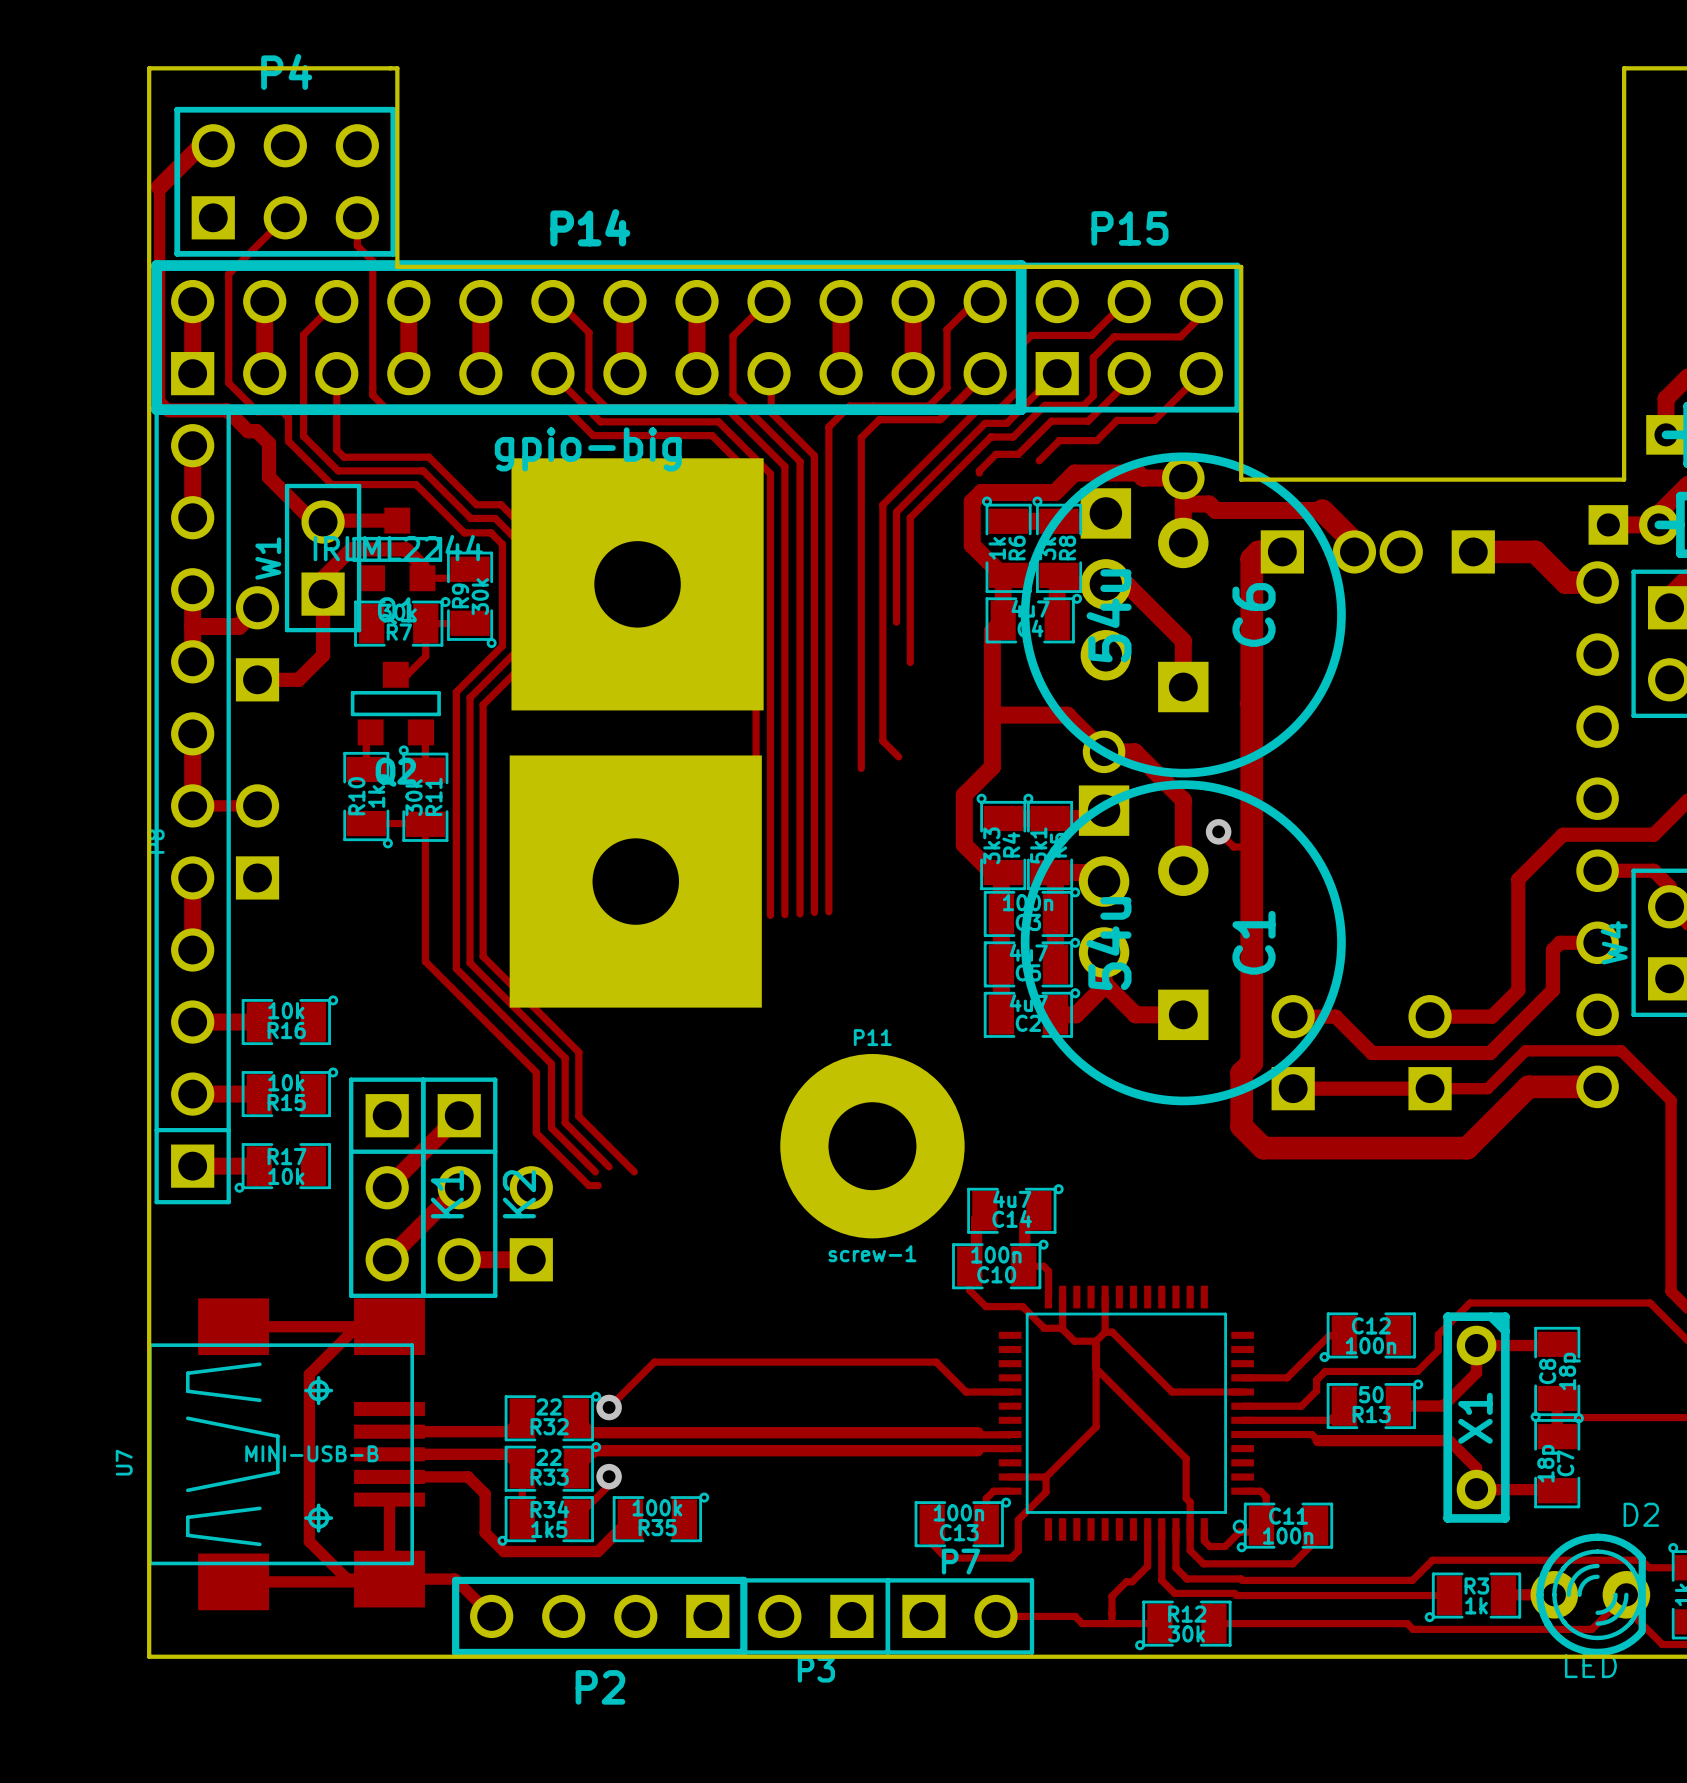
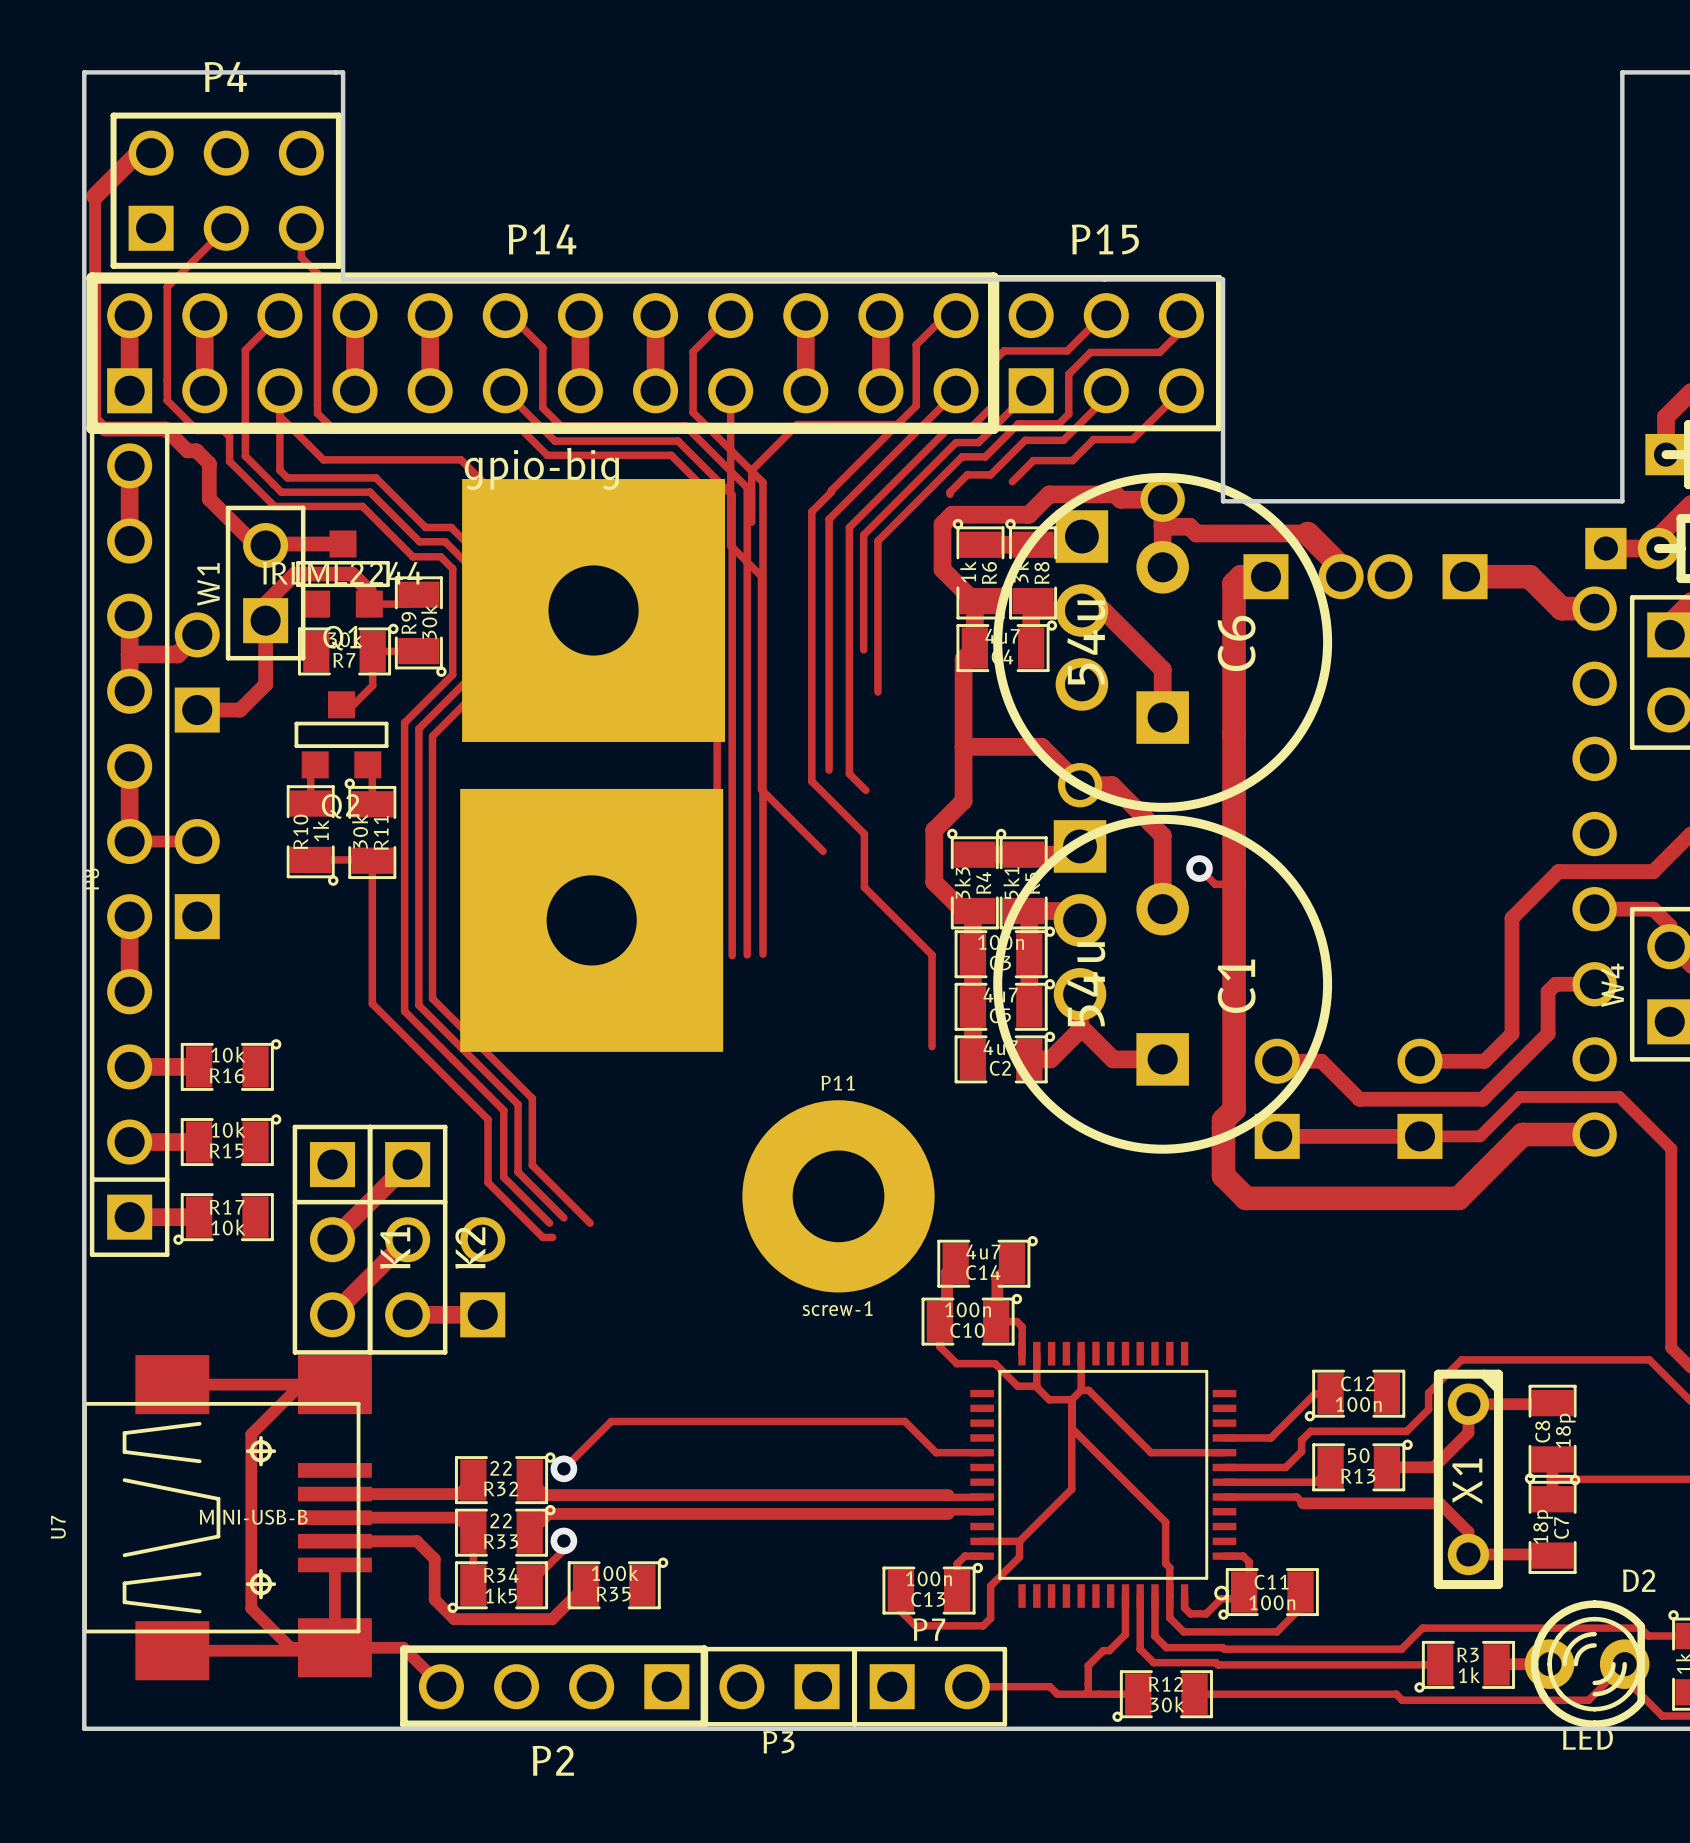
track: (769, 373) (771, 375) (771, 412) (814, 455) (814, 912) -> (730, 390) (730, 545) (761, 576) (761, 789) (823, 851)
track: (985, 373) (939, 419) (879, 419) (861, 437) (861, 768) -> none
track: none -> (279, 416) (323, 459) (460, 459) (506, 505) (506, 589)
track: (849, 406) (828, 426) (828, 911) -> (814, 424) (797, 424) (751, 470) (751, 522)
track: none -> (897, 424) (811, 511) (811, 781) (864, 834) (864, 887) (932, 954) (932, 1046)
track: none -> (909, 438) (829, 519) (829, 770)

